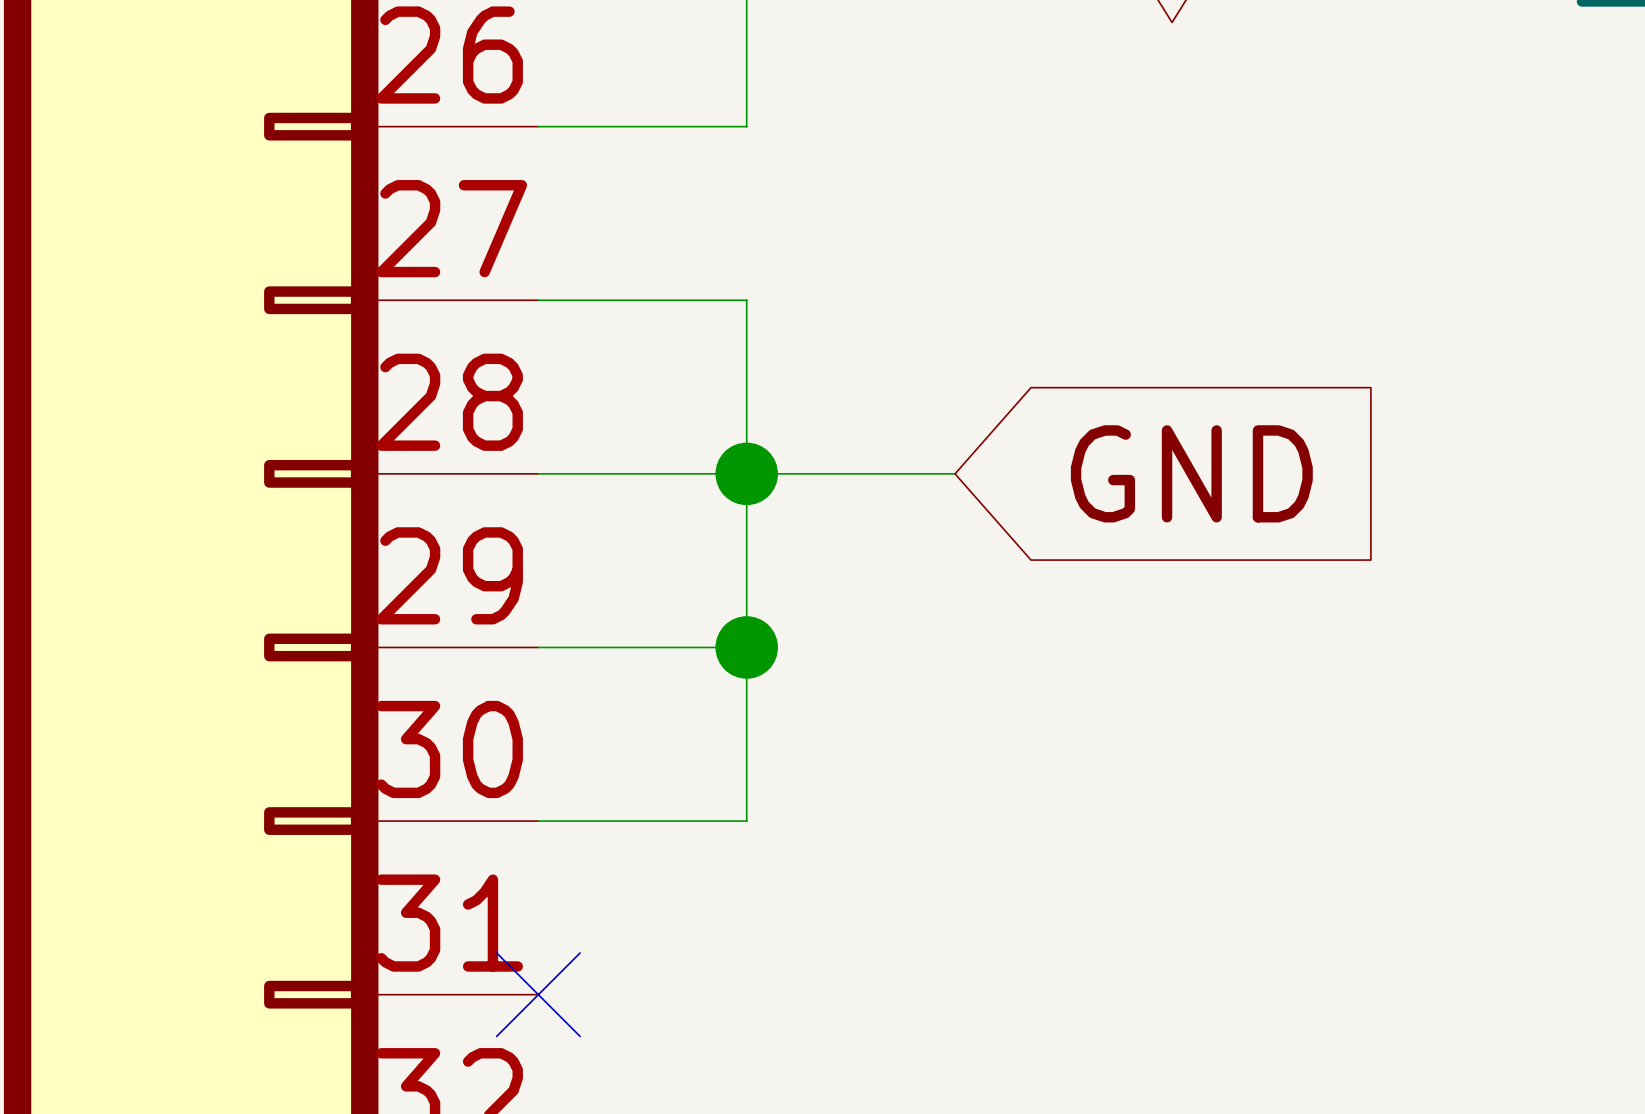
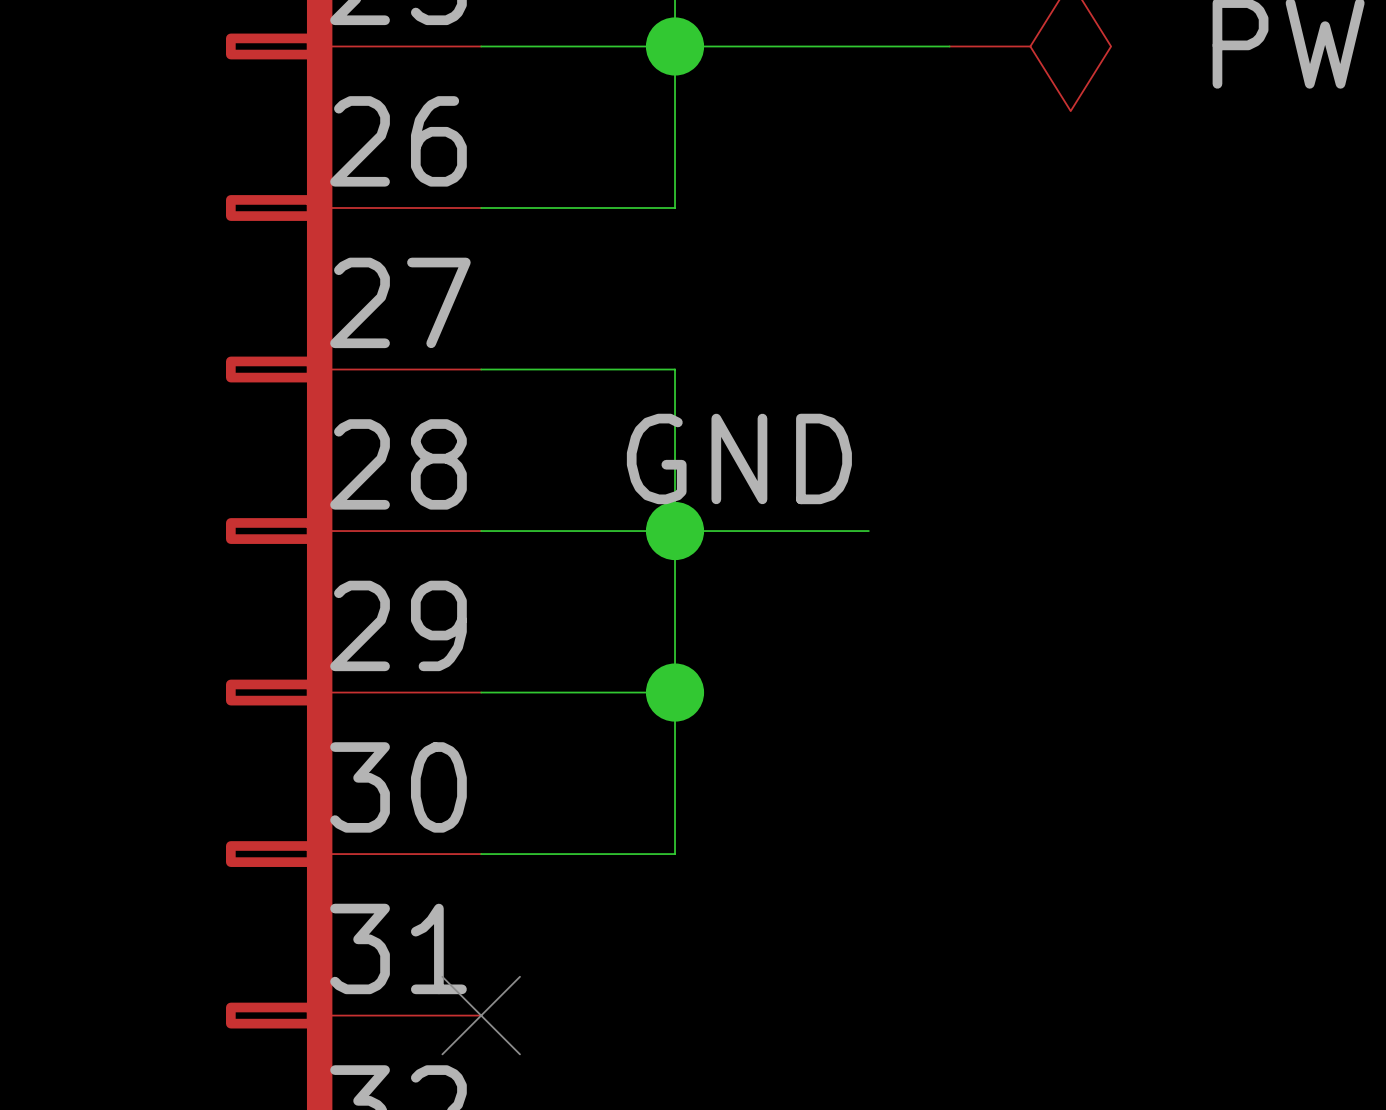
label: none -> GND (739, 458)
global label: GND (1191, 473) -> none

